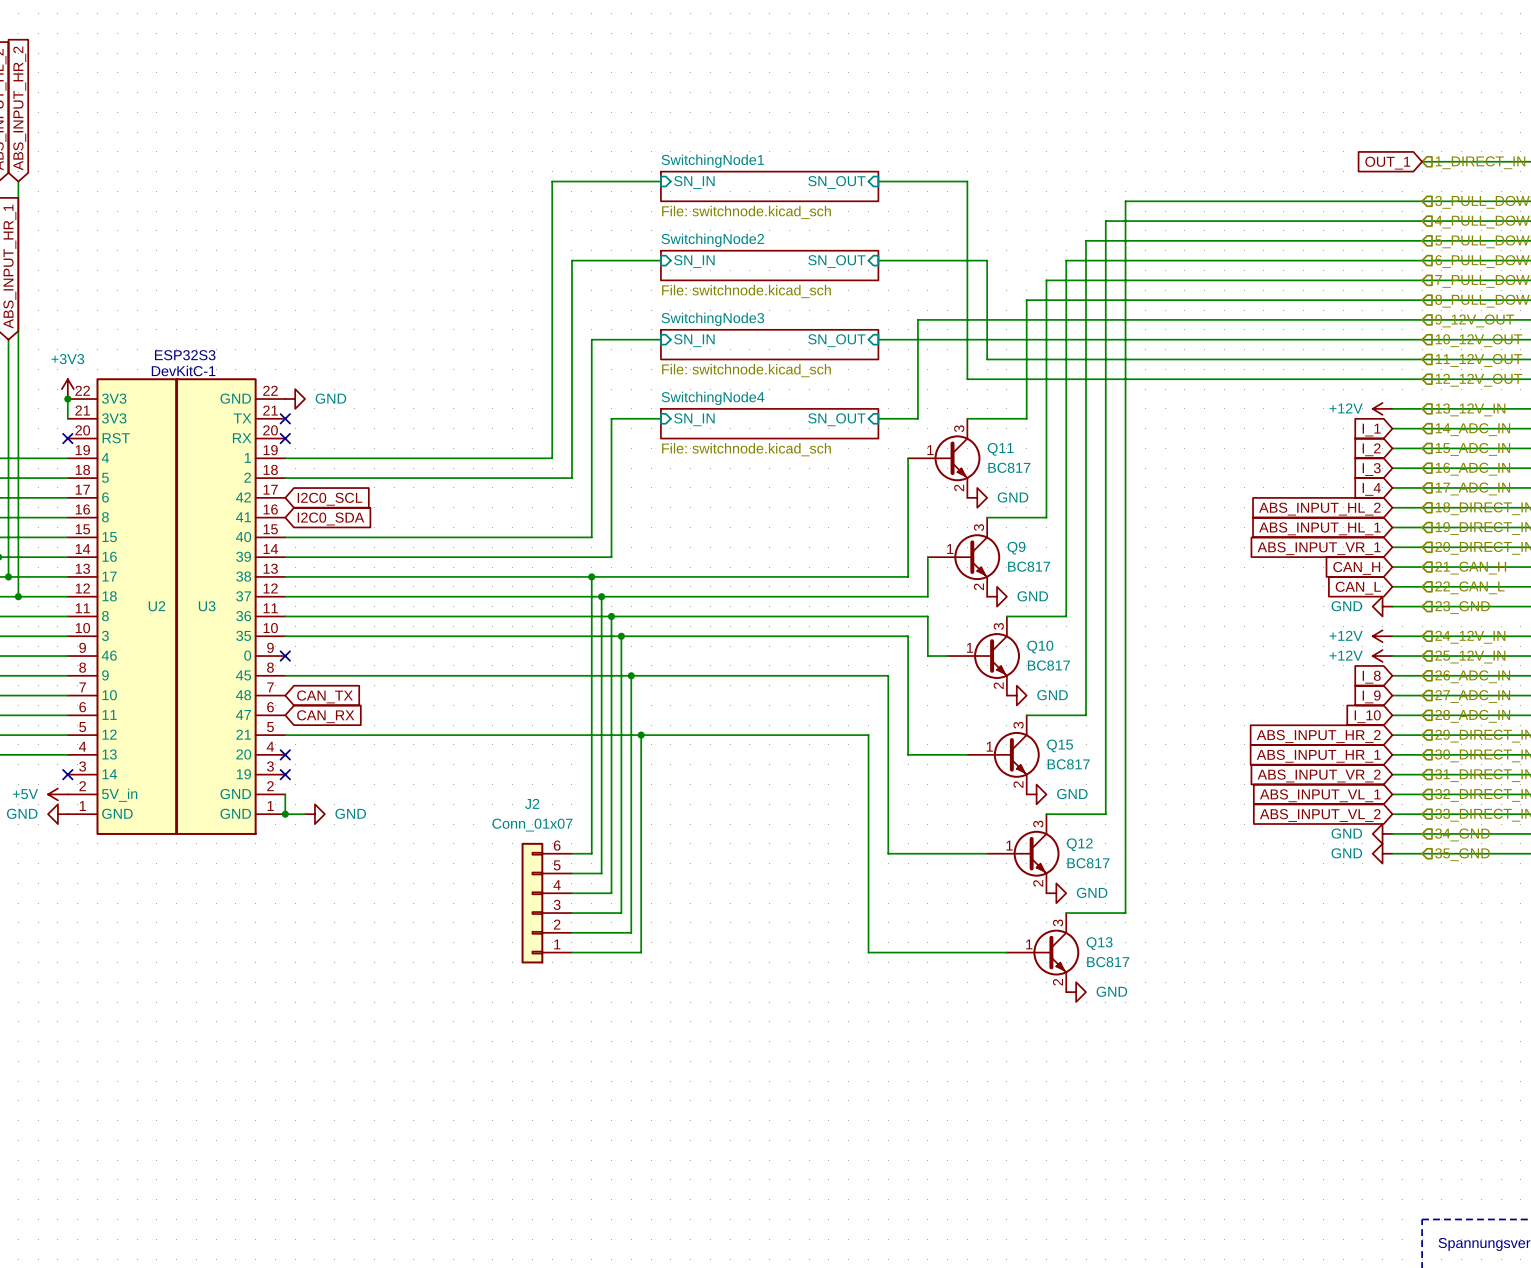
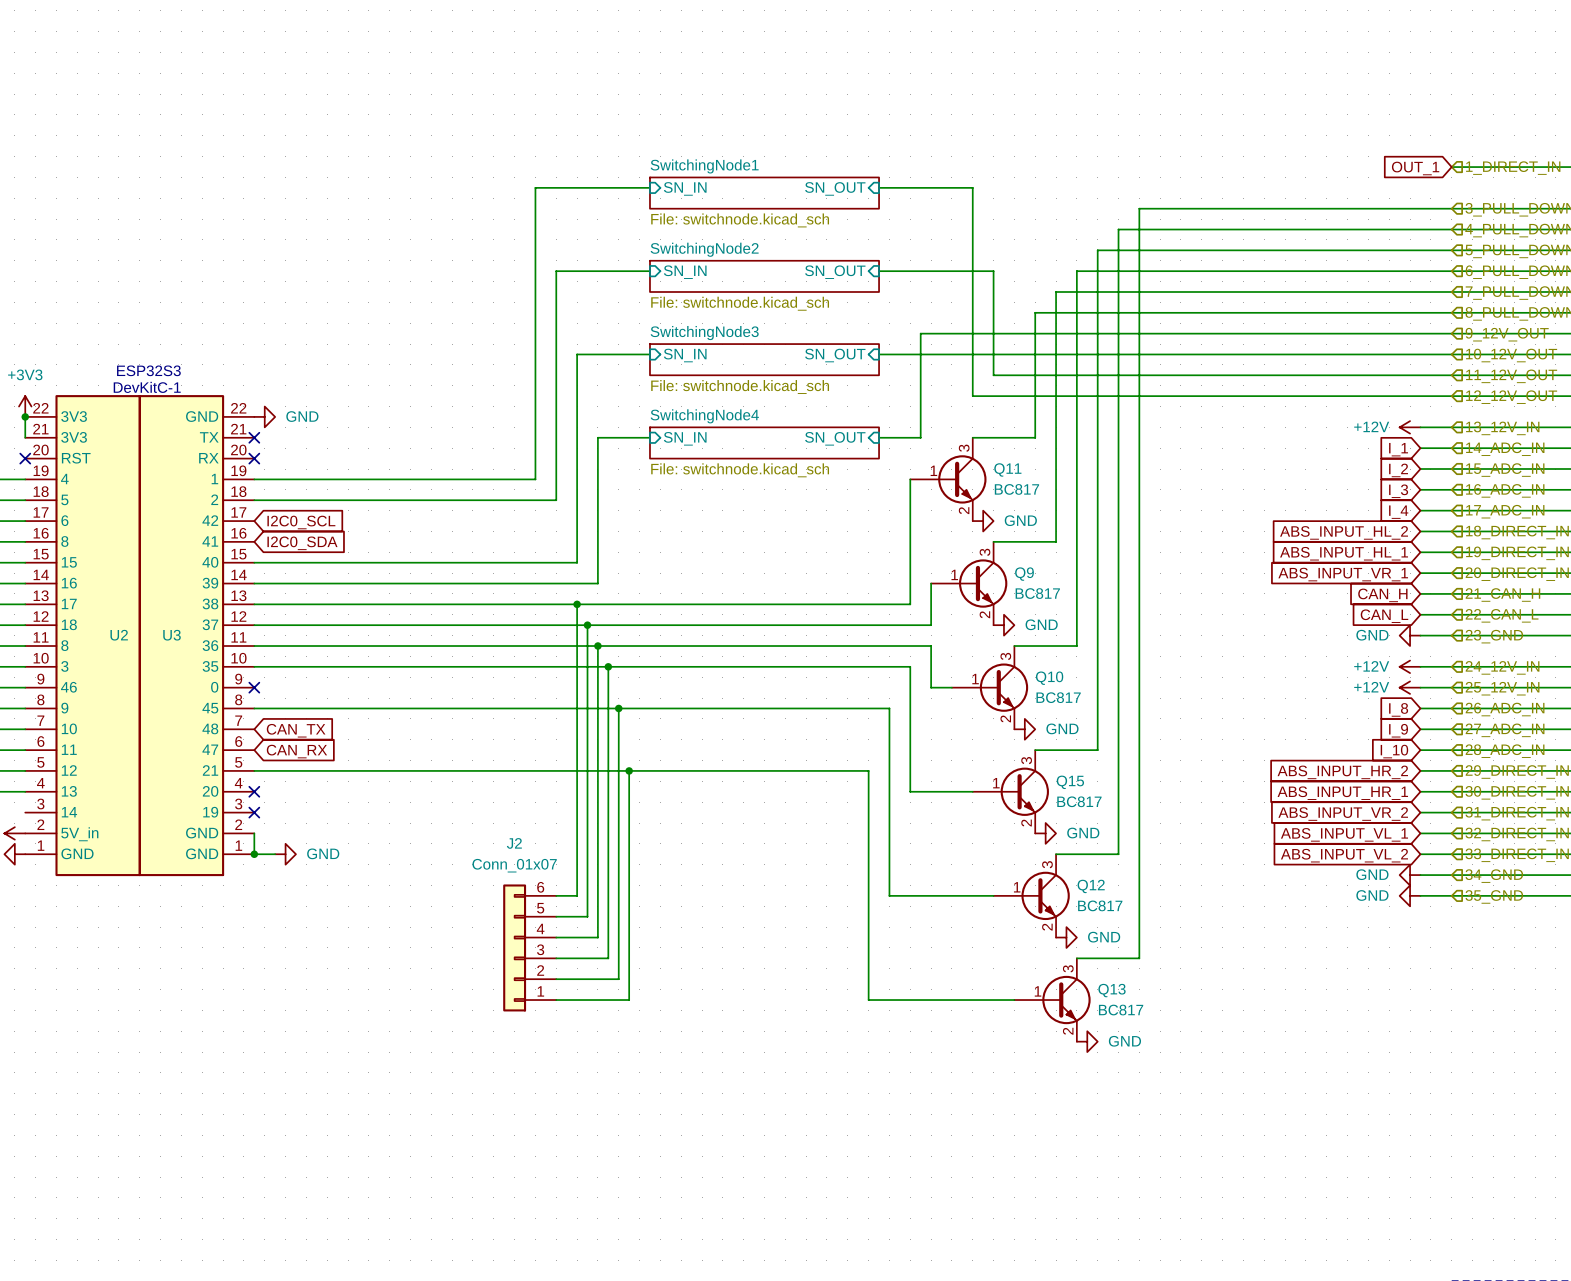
no-connect mark: (67, 774) -> none

